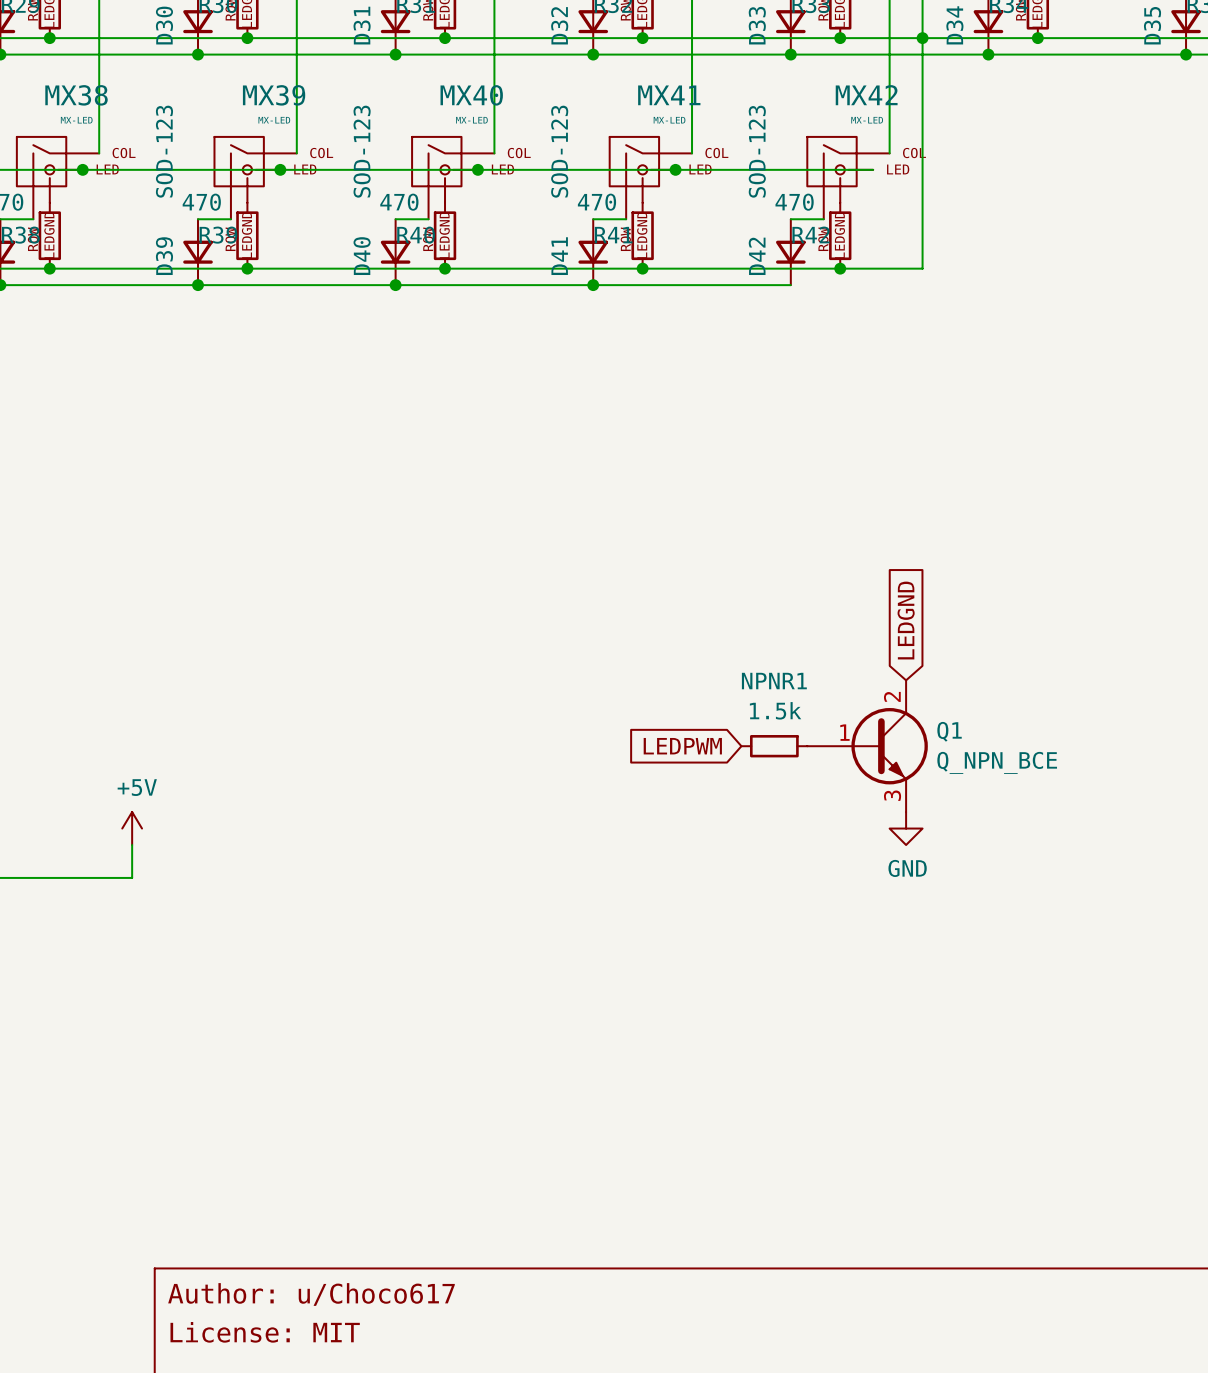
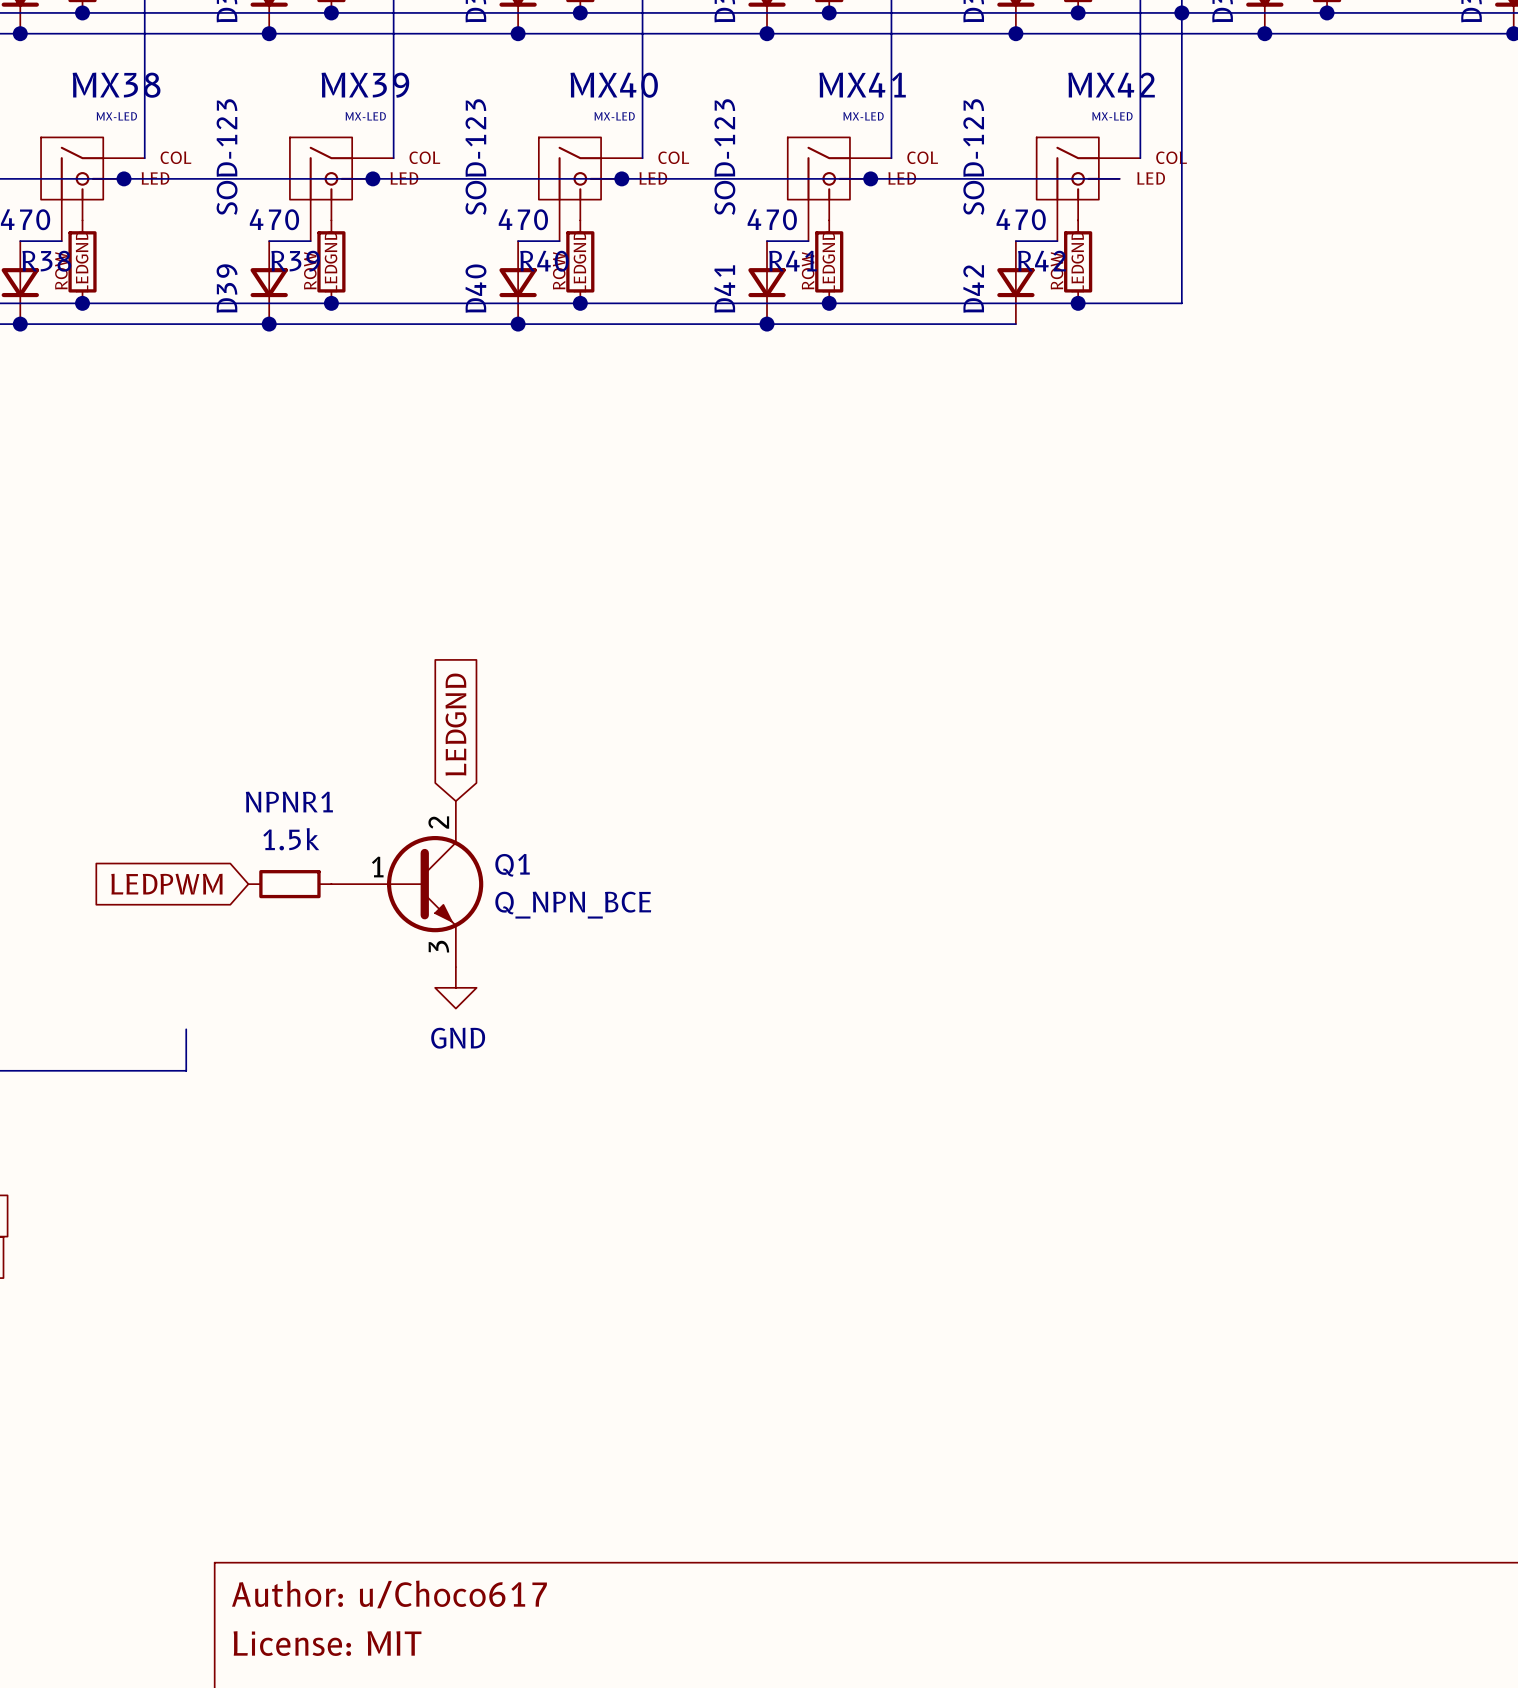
global label: none -> LEDGND (455, 724)
global label: LEDGND (906, 620) -> none
global label: none -> LEDPWM (166, 884)
global label: LEDPWM (682, 746) -> none
NPNR1 position: (774, 746) -> (289, 884)
Q1 position: (867, 746) -> (407, 884)
power symbol: none -> GND (455, 987)
power symbol: +5V (132, 828) -> none
power symbol: GND (906, 828) -> none

